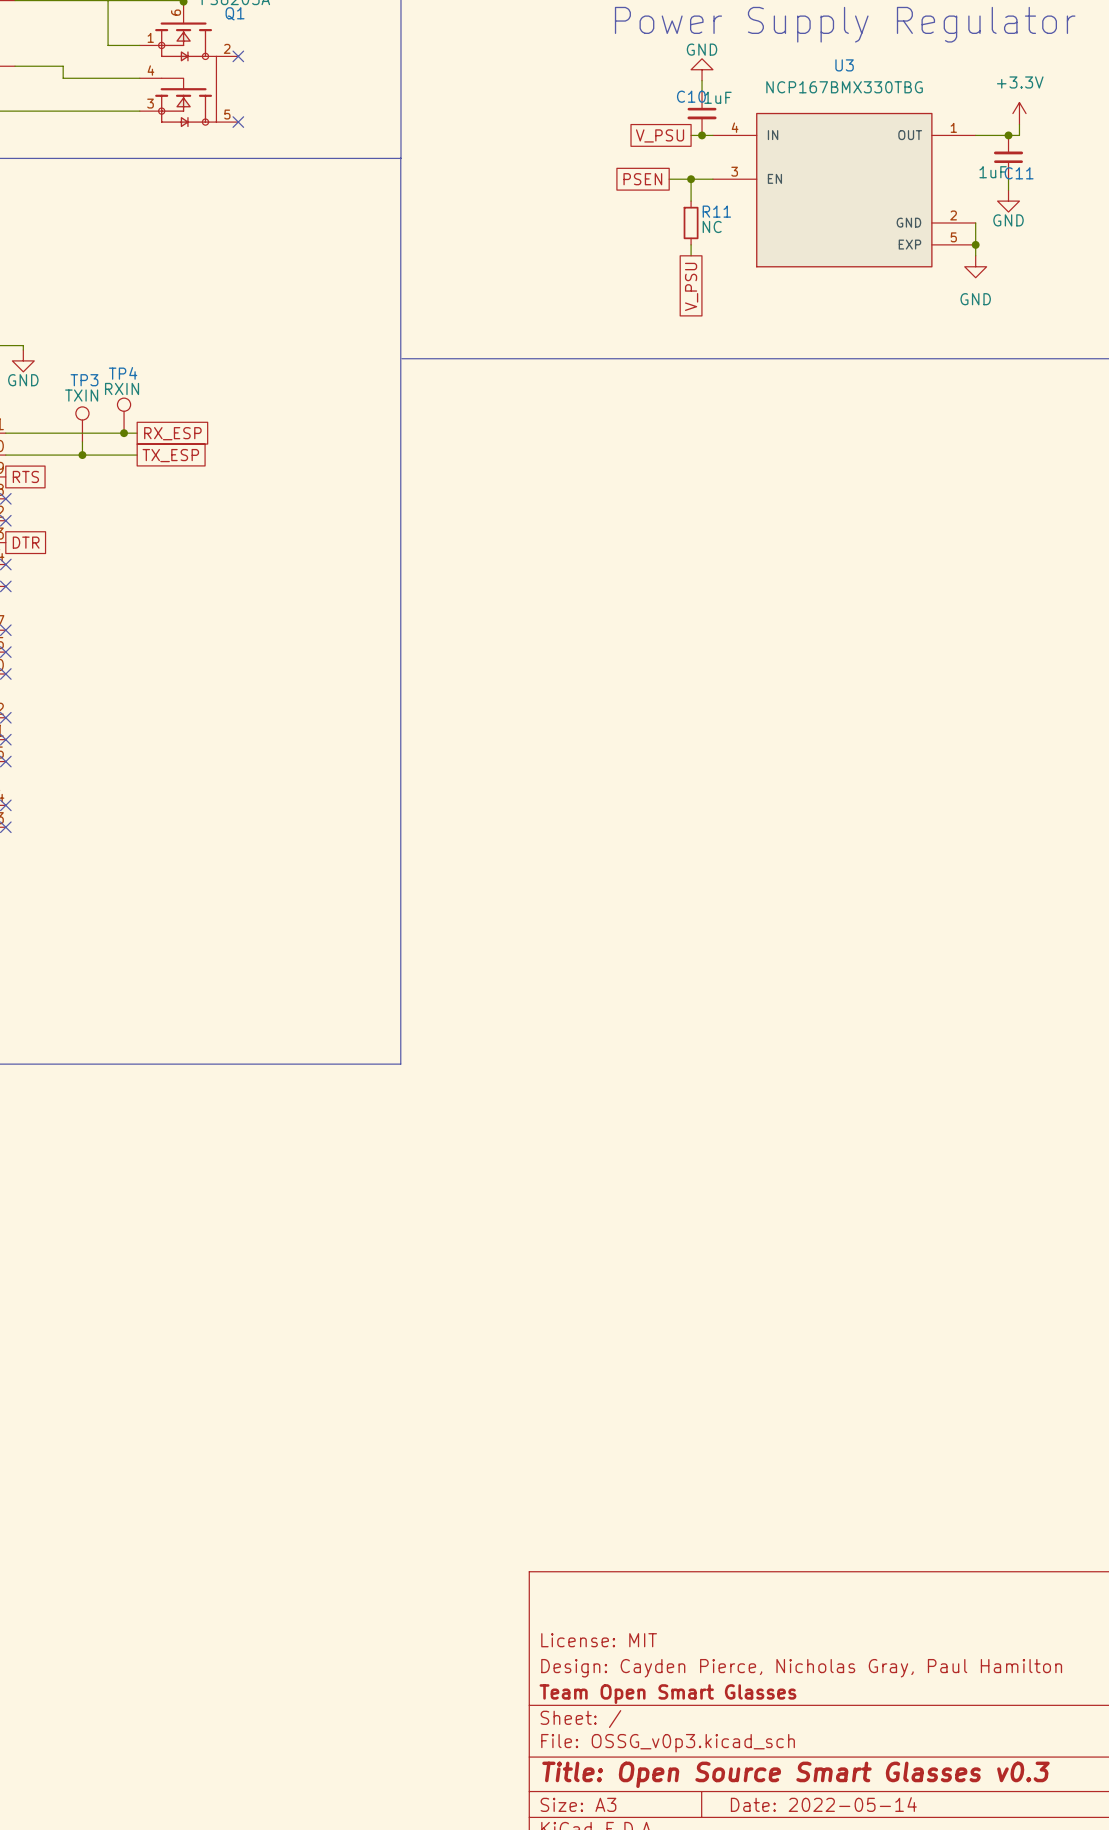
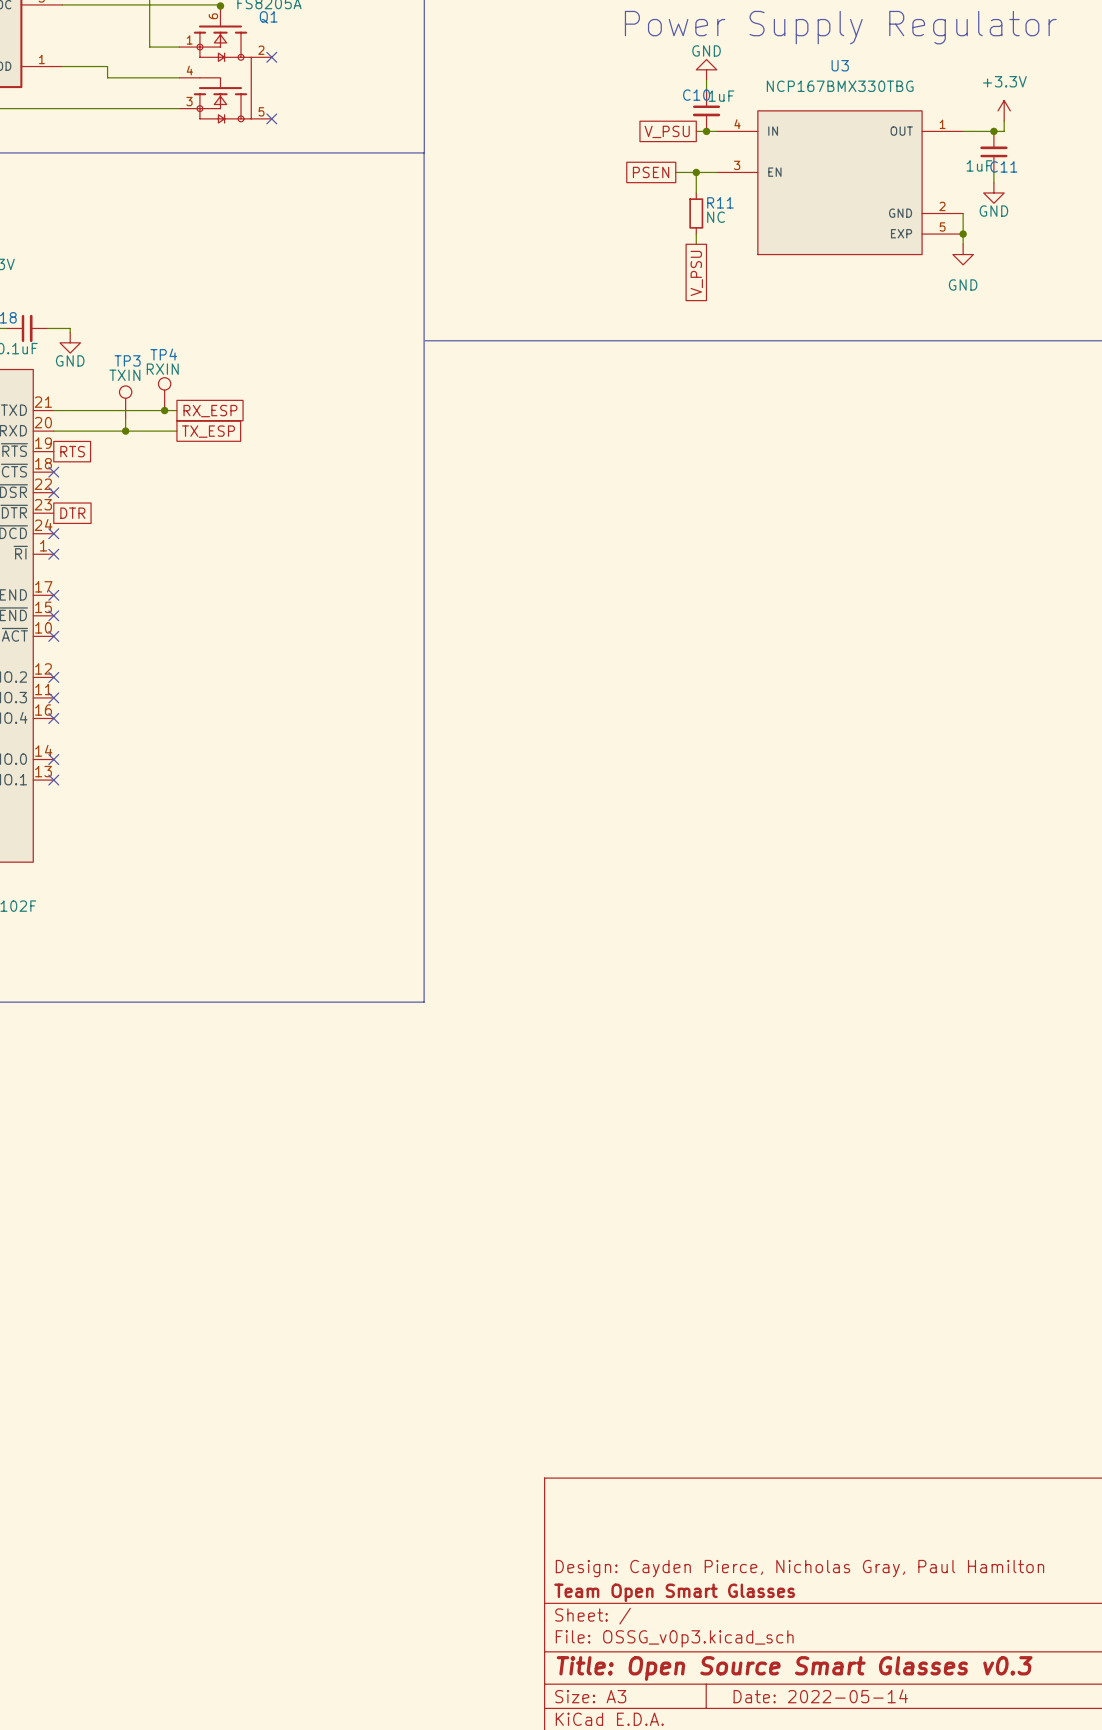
title block: License: MIT (599, 1640) -> none

